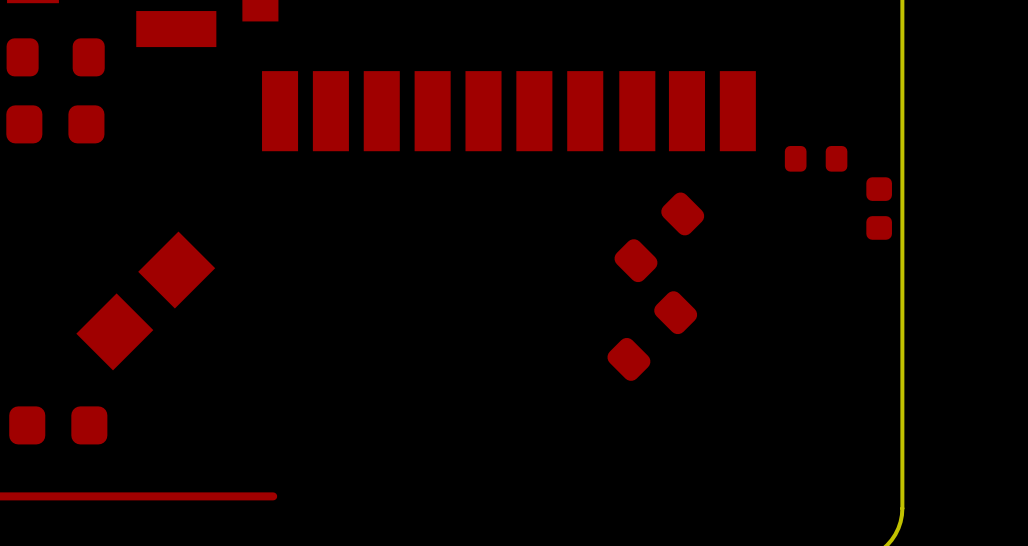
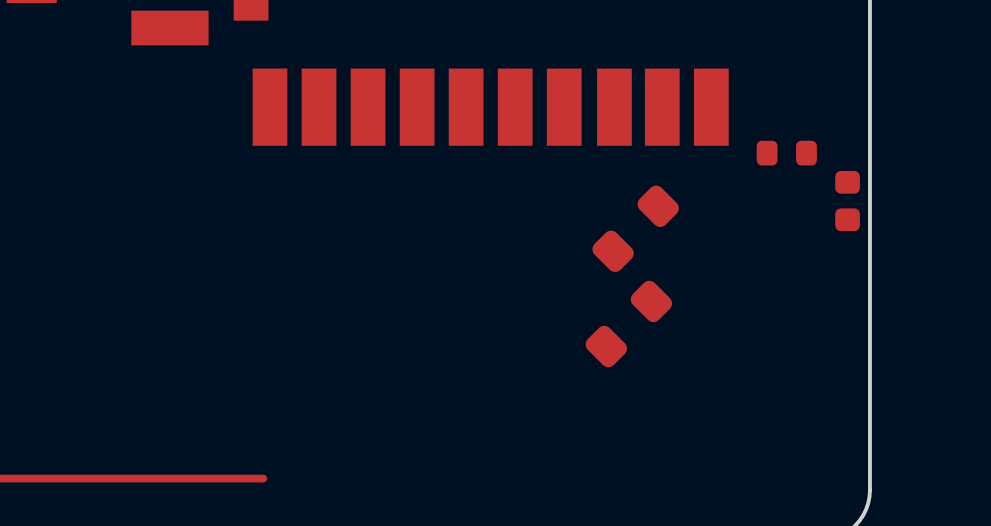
part: (55, 57) -> none
part: (55, 124) -> none
part: (145, 300) -> none
part: (58, 425) -> none

